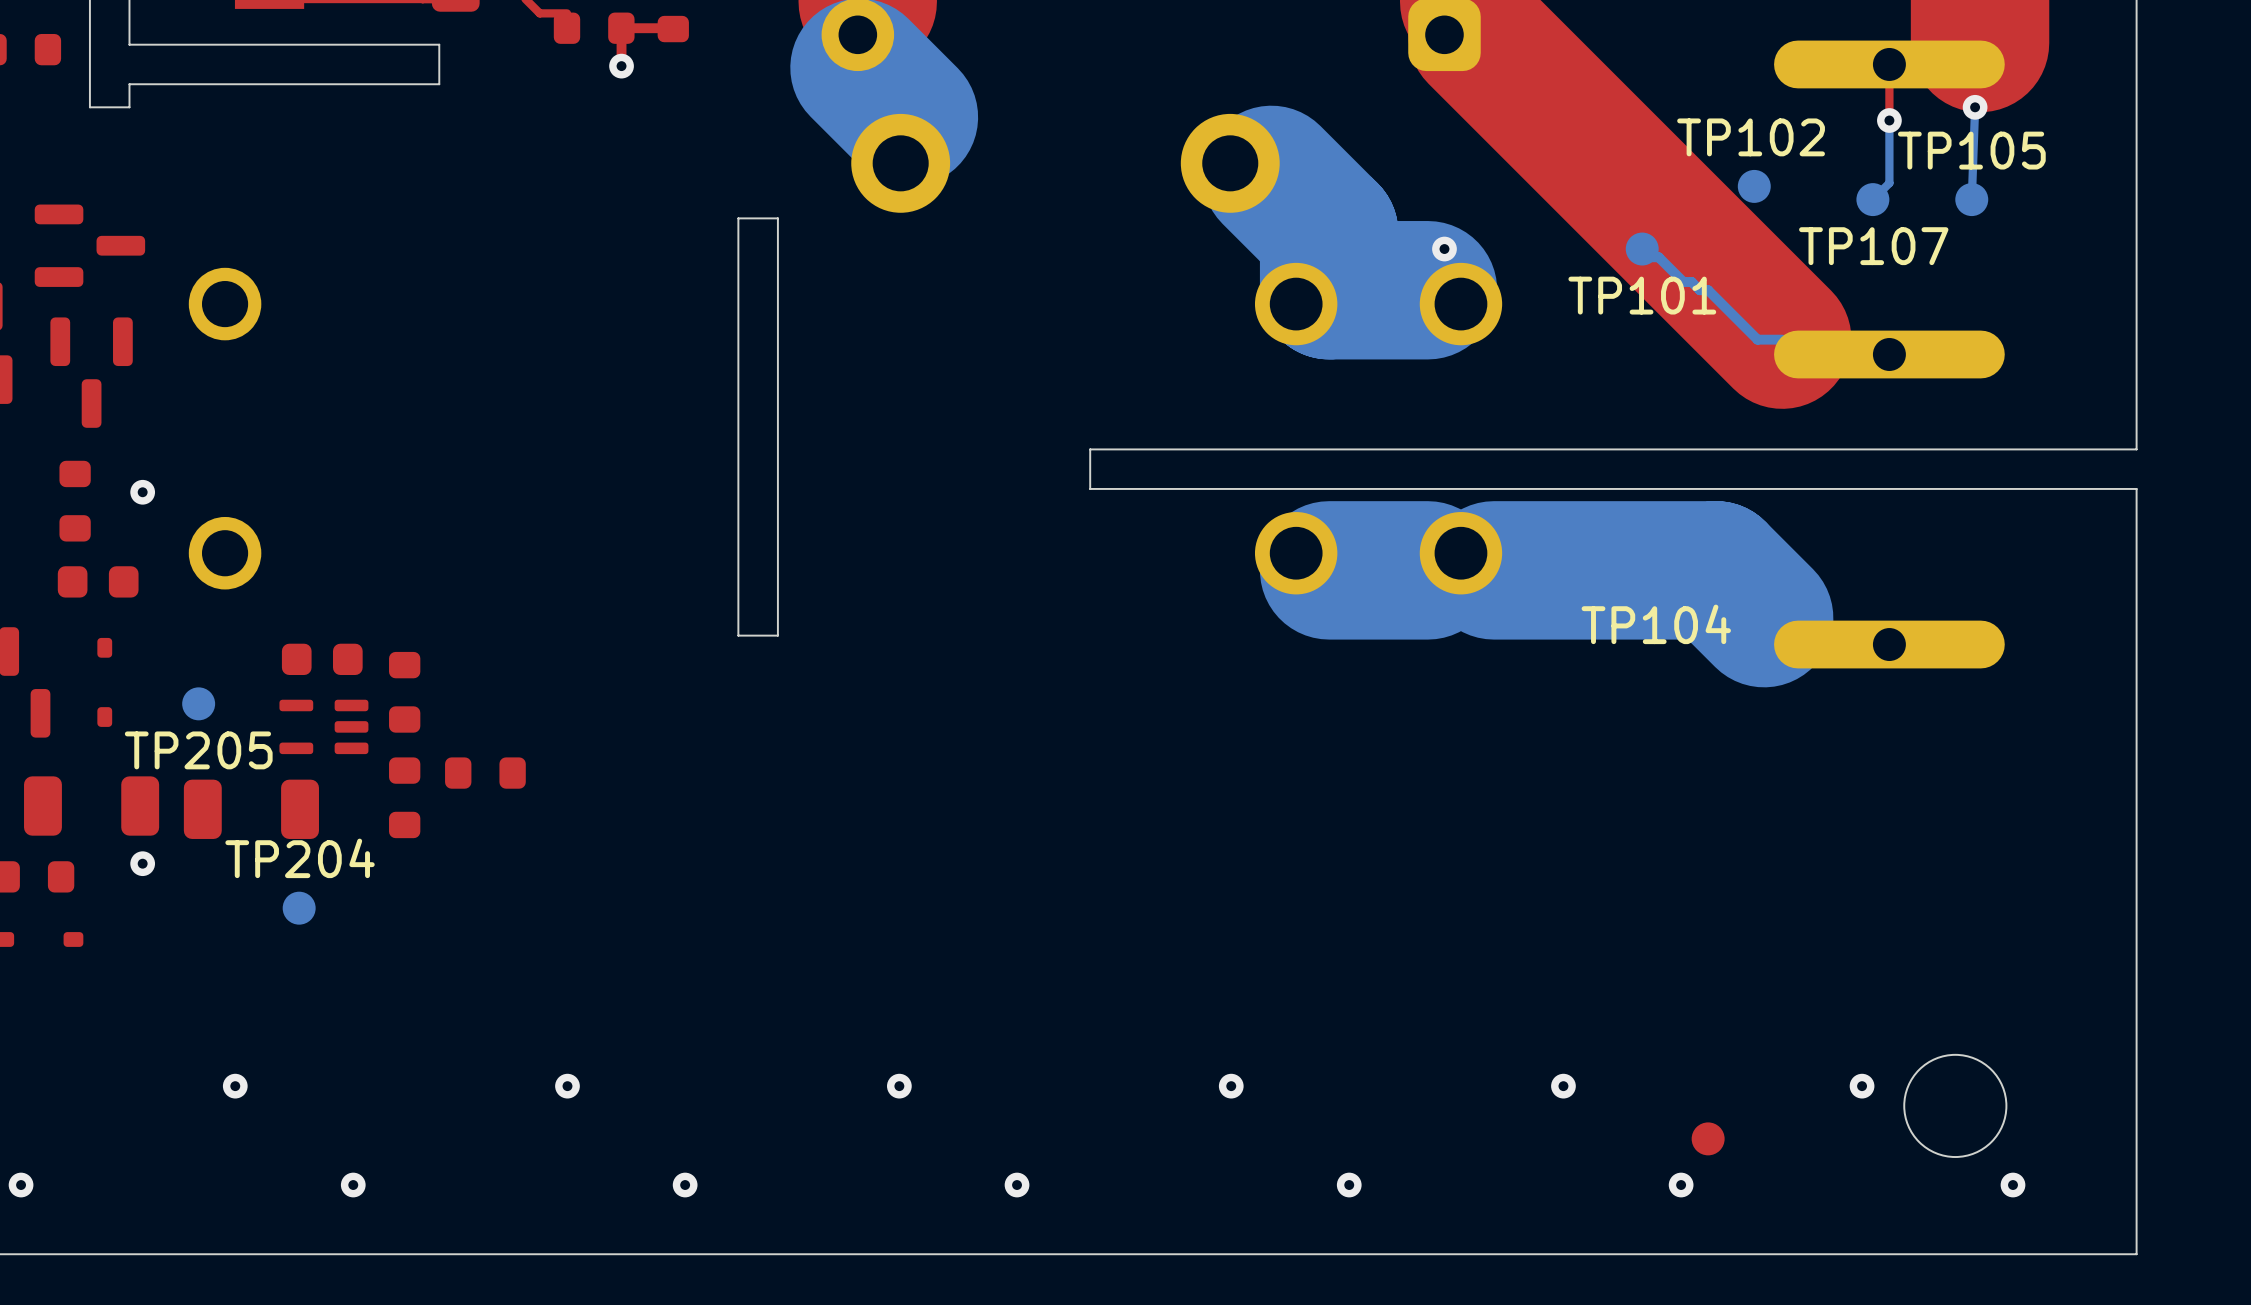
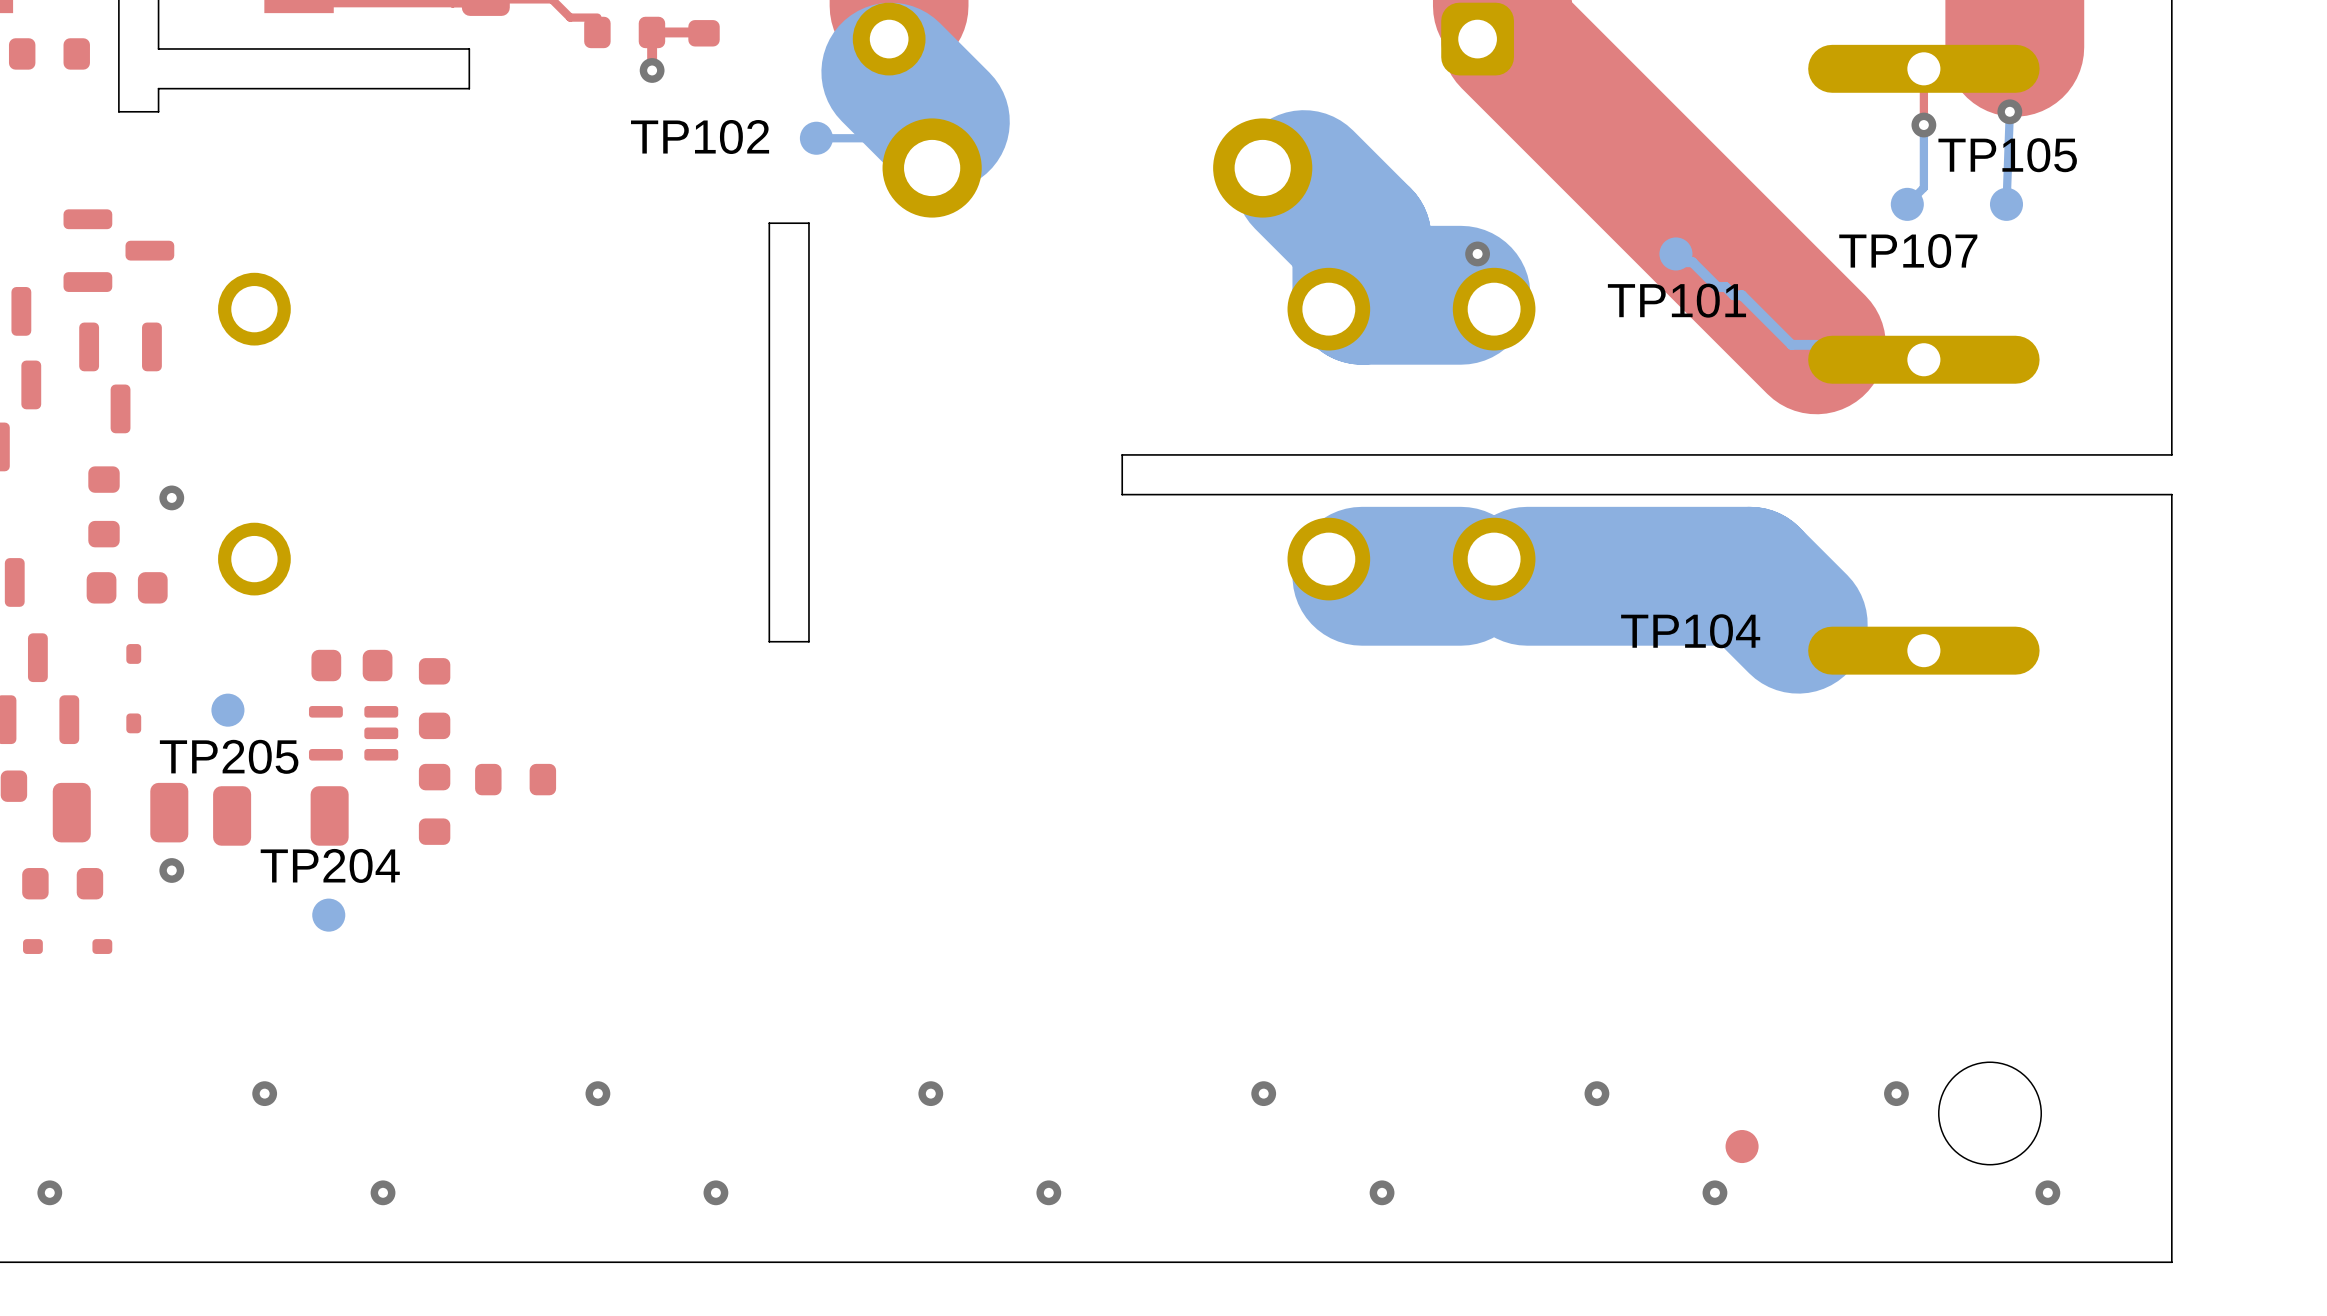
bottom track: none -> (872, 138) (816, 138)
TP102 name position: TP102 (1751, 137) -> TP102 (700, 137)
TP102 position: (1754, 186) -> (816, 138)

